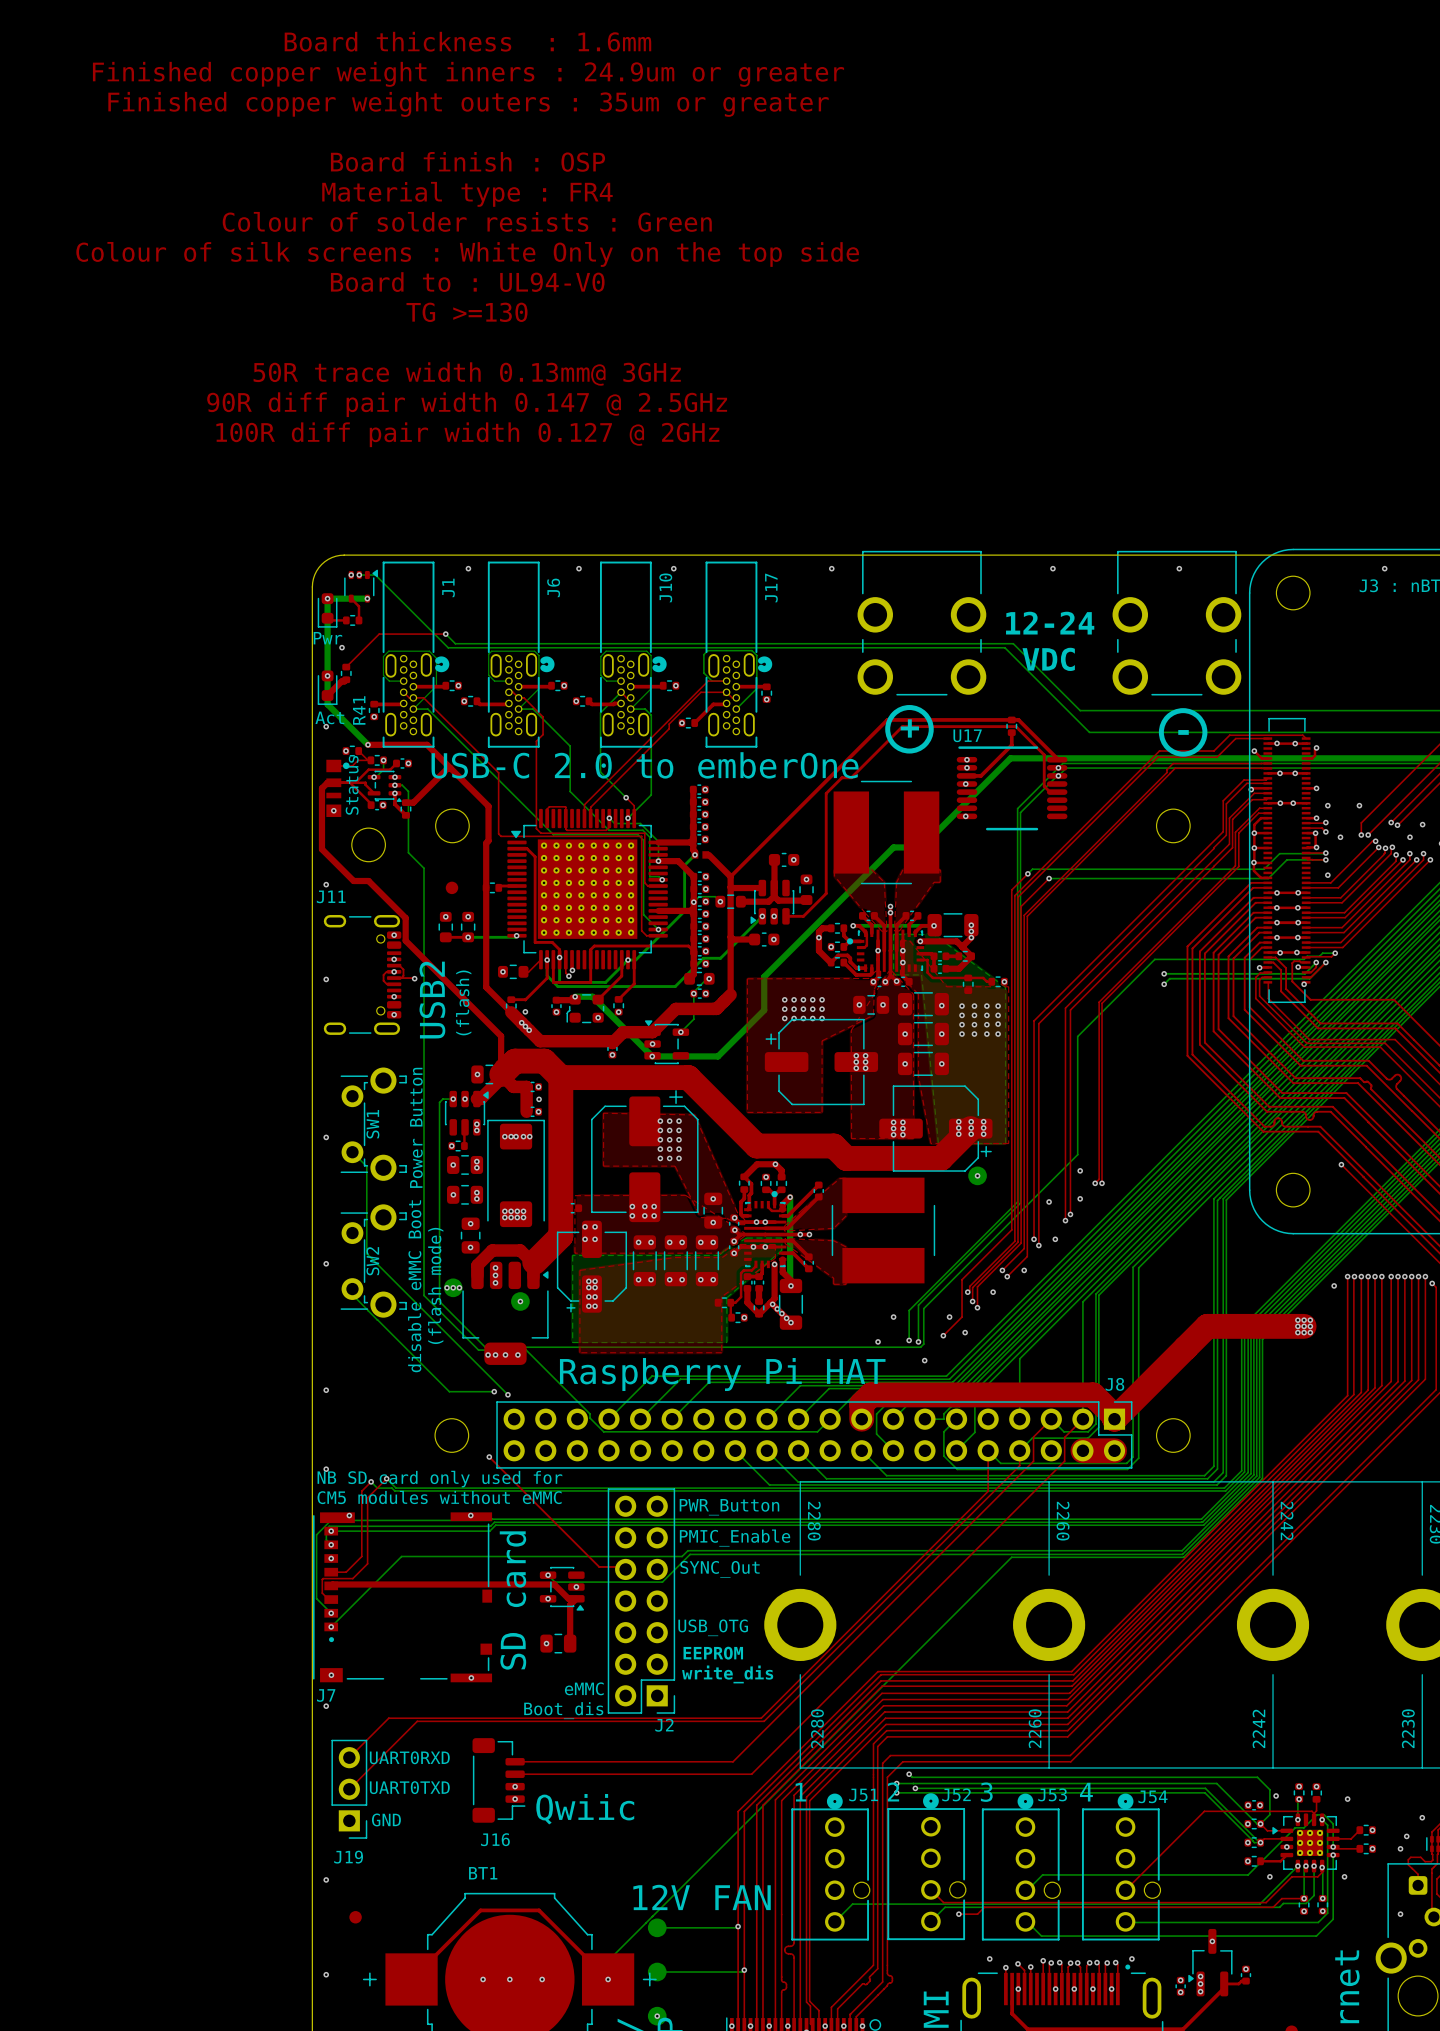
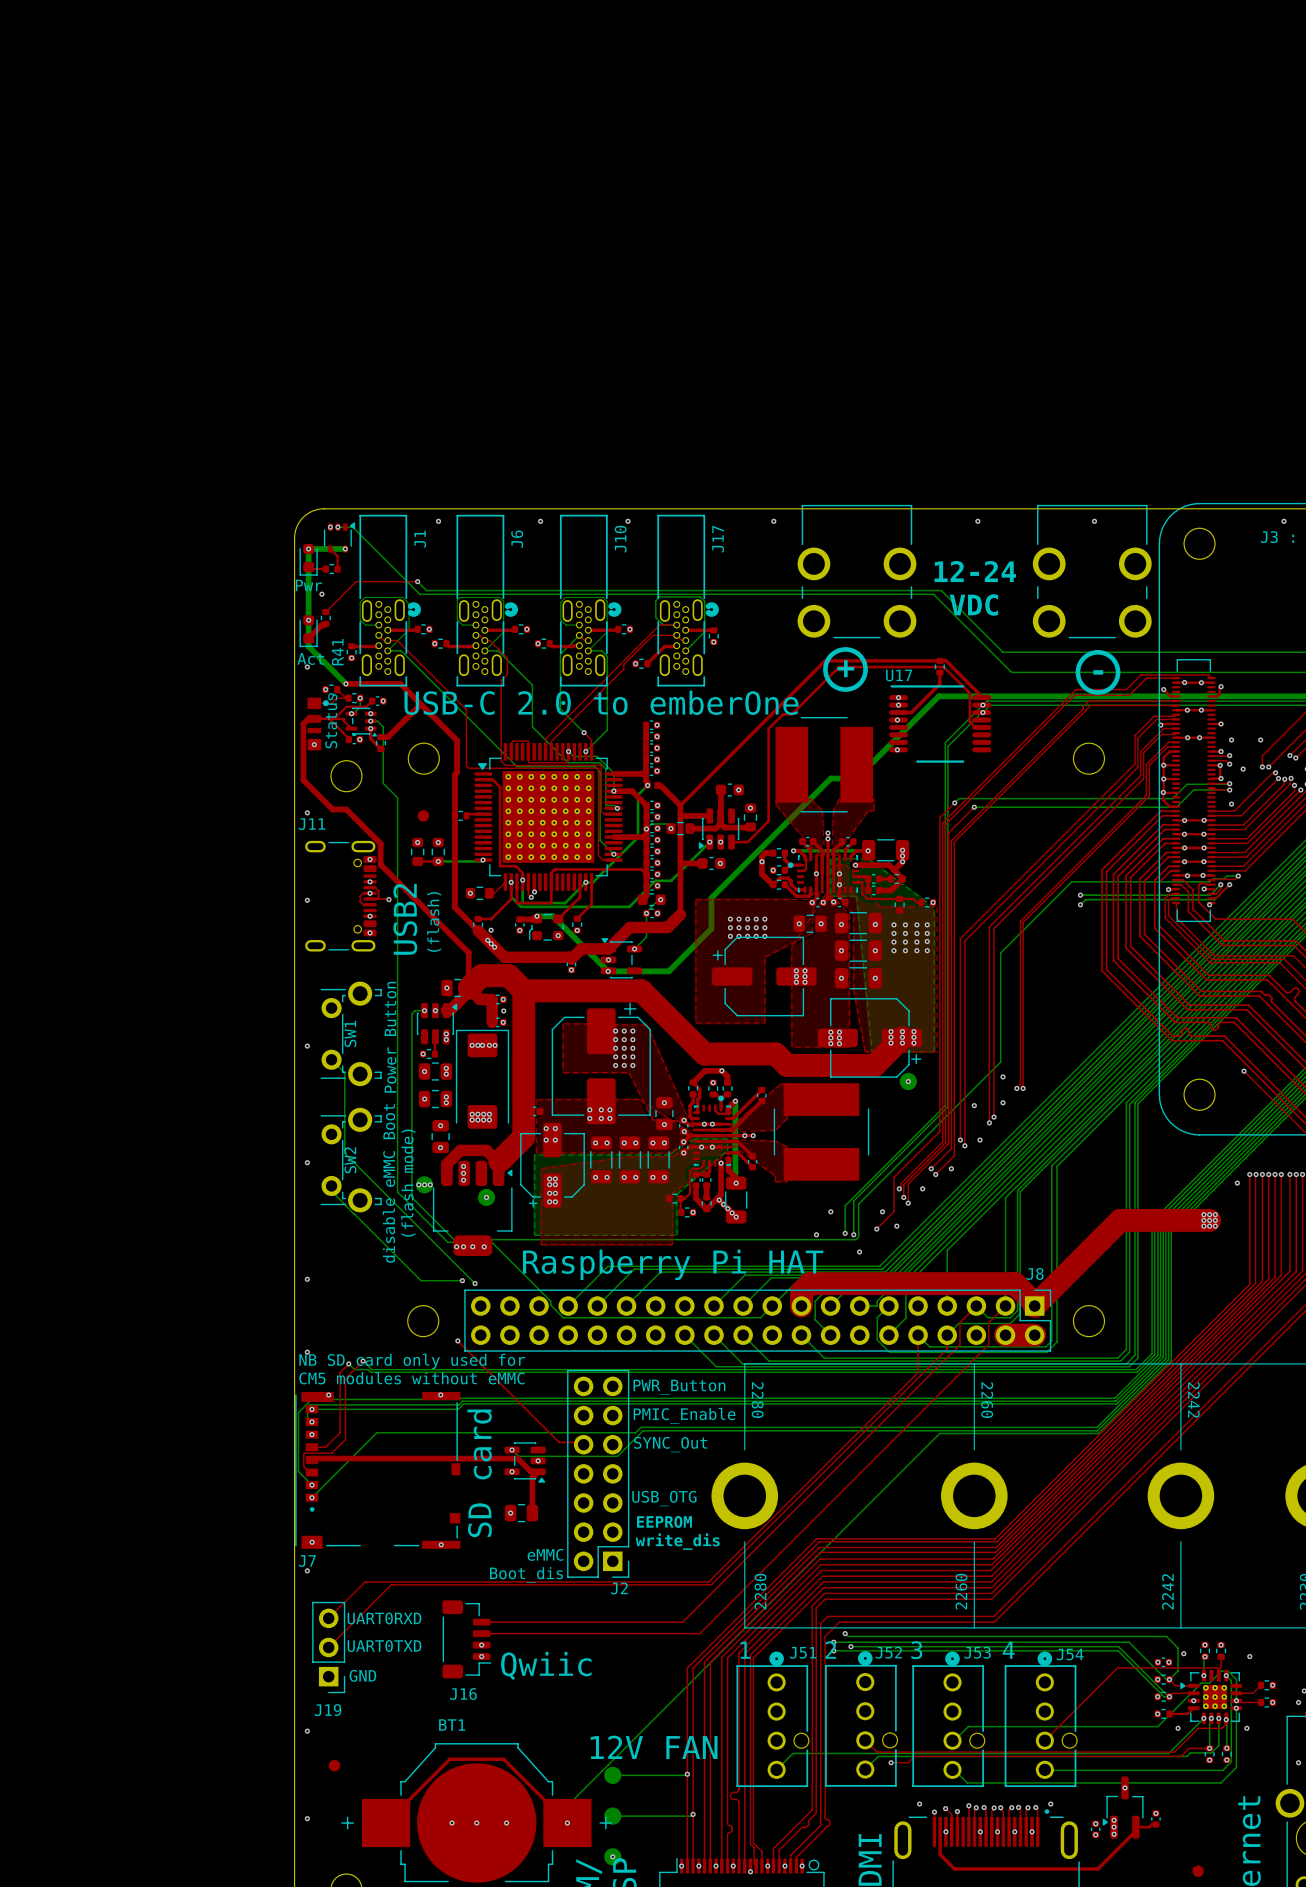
text: Board thickness : 1.6mm (467, 41) -> none
text: Finished copper weight inners : 24.9um or greater (468, 74) -> none
text: Finished copper weight outers : 35um or greater (468, 104) -> none
text: Board finish : OSP (468, 161) -> none
text: Material type : FR4 (467, 194) -> none
text: Colour of solder resists : Green (467, 221) -> none
text: Colour of silk screens : White Only on the top side (467, 254) -> none
text: Board to : UL94-V0 (467, 282) -> none
text: TG >=130 (467, 312) -> none
text: 50R trace width 0.13mm@ 3GHz (467, 373) -> none
text: 90R diff pair width 0.147 @ 2.5GHz (467, 404) -> none
text: 100R diff pair width 0.127 @ 2GHz (467, 434) -> none

